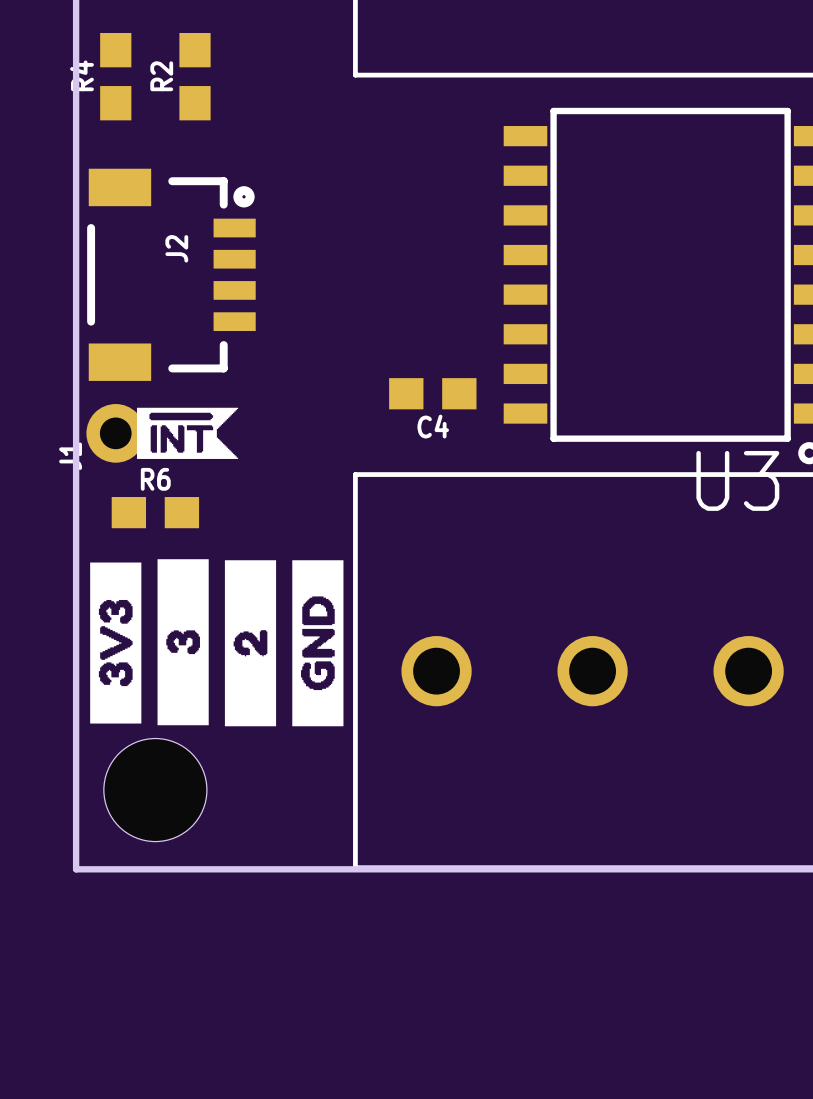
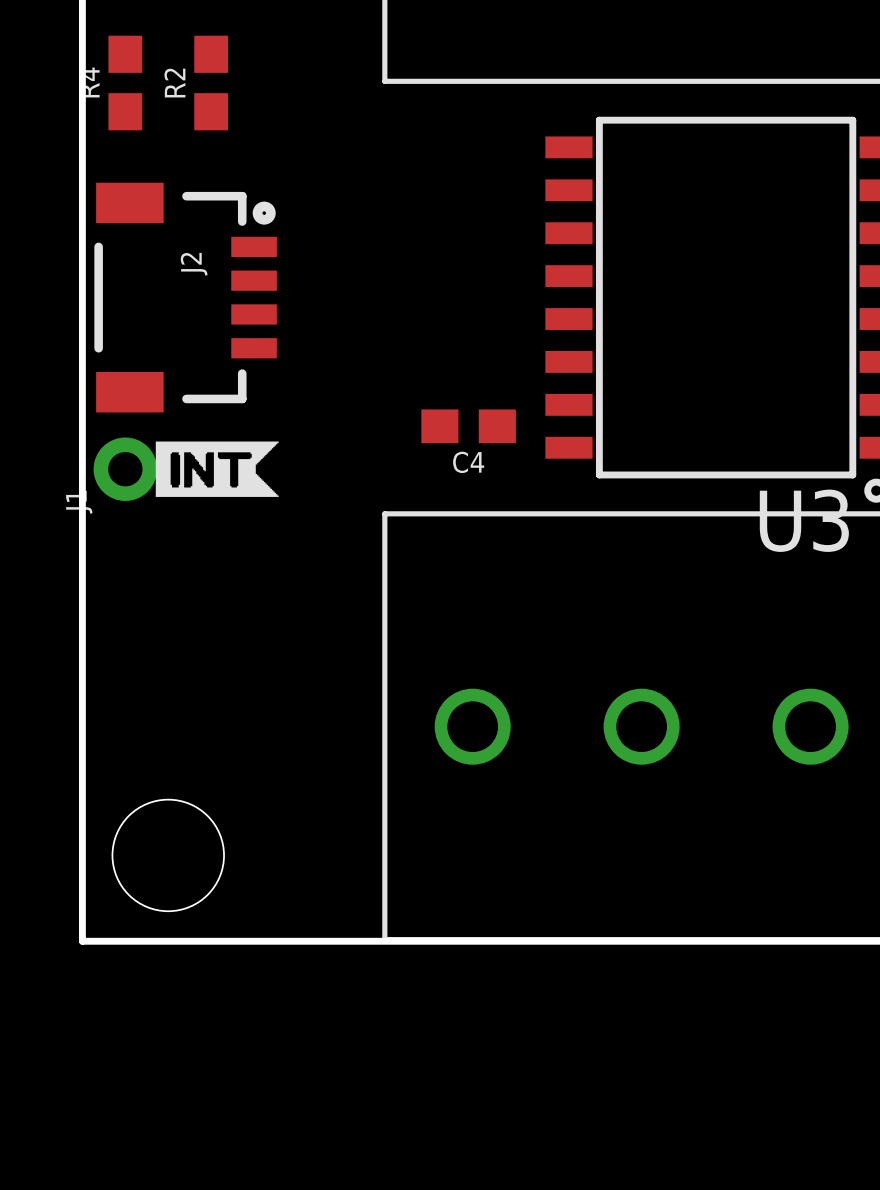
drawing shape: [136, 407, 239, 459] -> [155, 441, 279, 497]
R6: (155, 512) -> none
drawing: [90, 559, 344, 727] -> none

